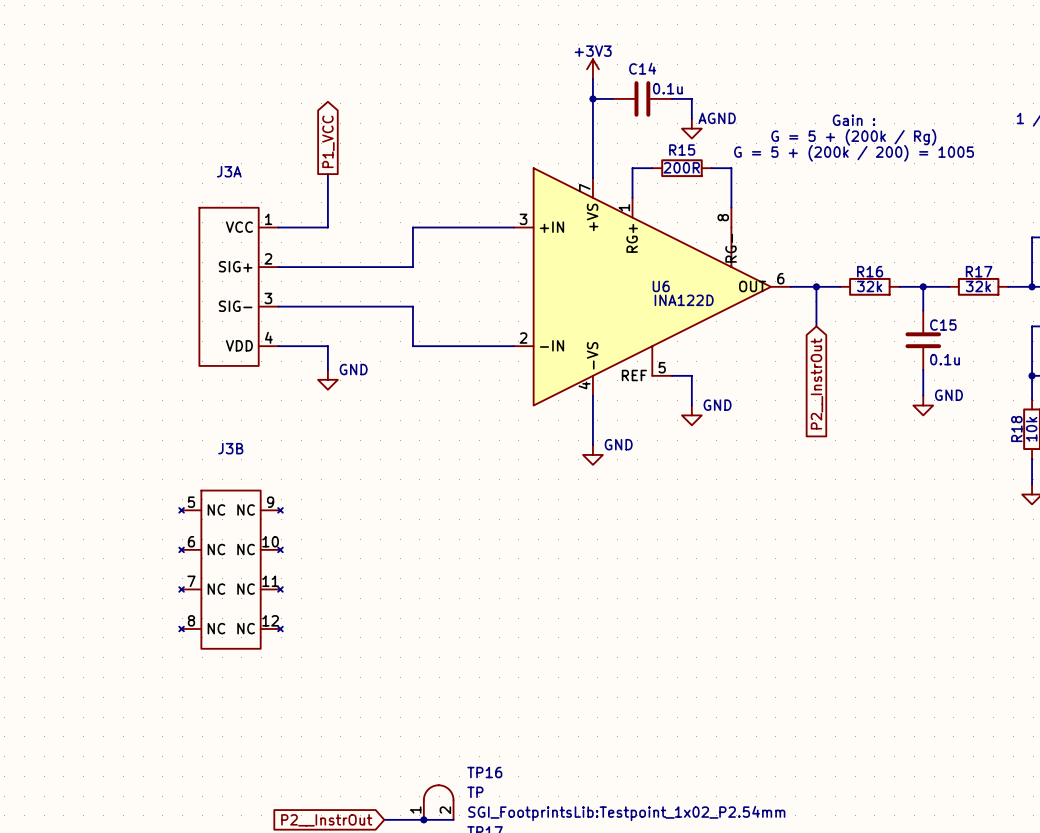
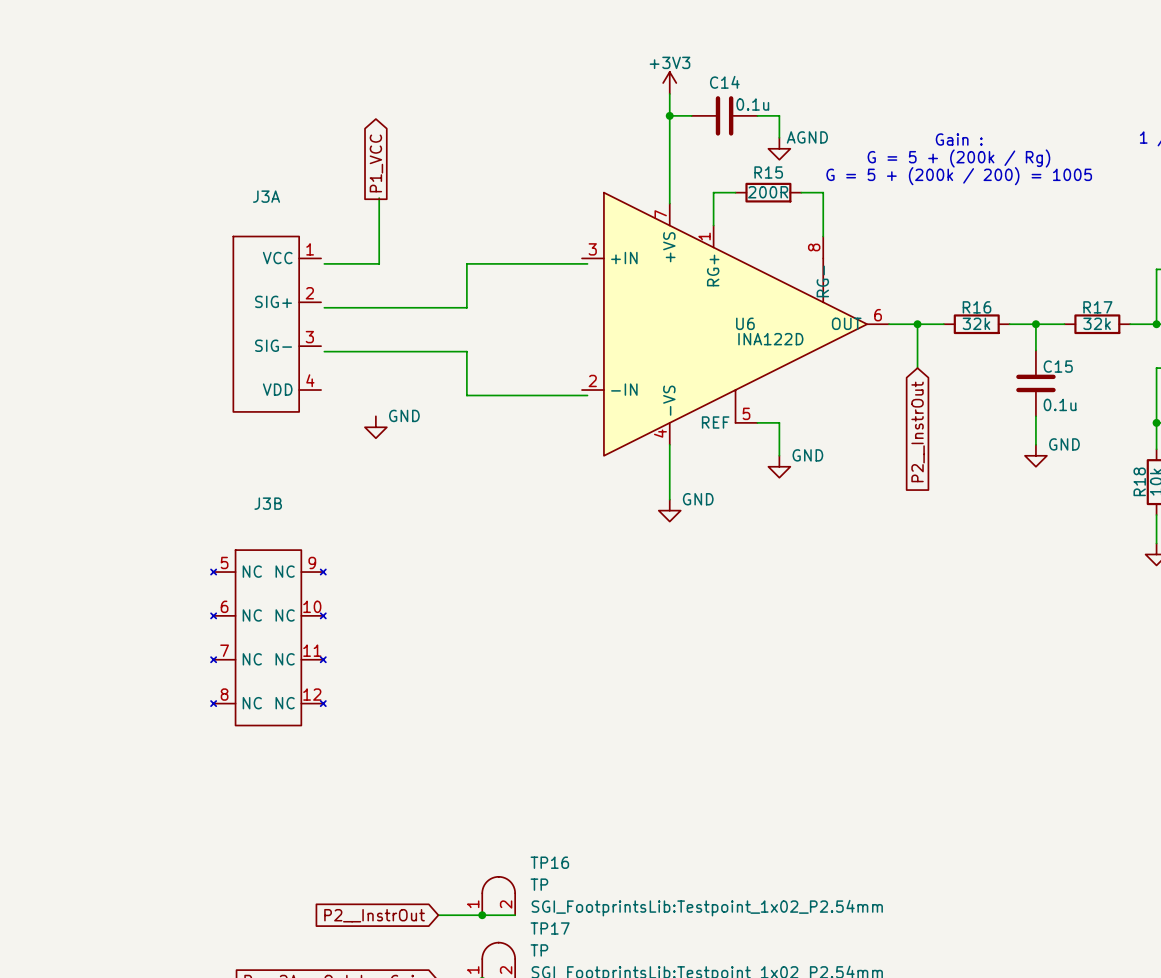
wire: none -> (379, 198) (379, 263) (324, 263)
wire: (327, 174) (327, 227) (278, 227) -> none
wire: (513, 227) (412, 227) (412, 267) (278, 267) -> none
wire: none -> (587, 263) (466, 263) (466, 307) (324, 307)
wire: (278, 306) (412, 306) (412, 346) (513, 346) -> none
wire: none -> (324, 351) (466, 351) (466, 395) (587, 395)
wire: (278, 346) (327, 346) (327, 369) -> none

